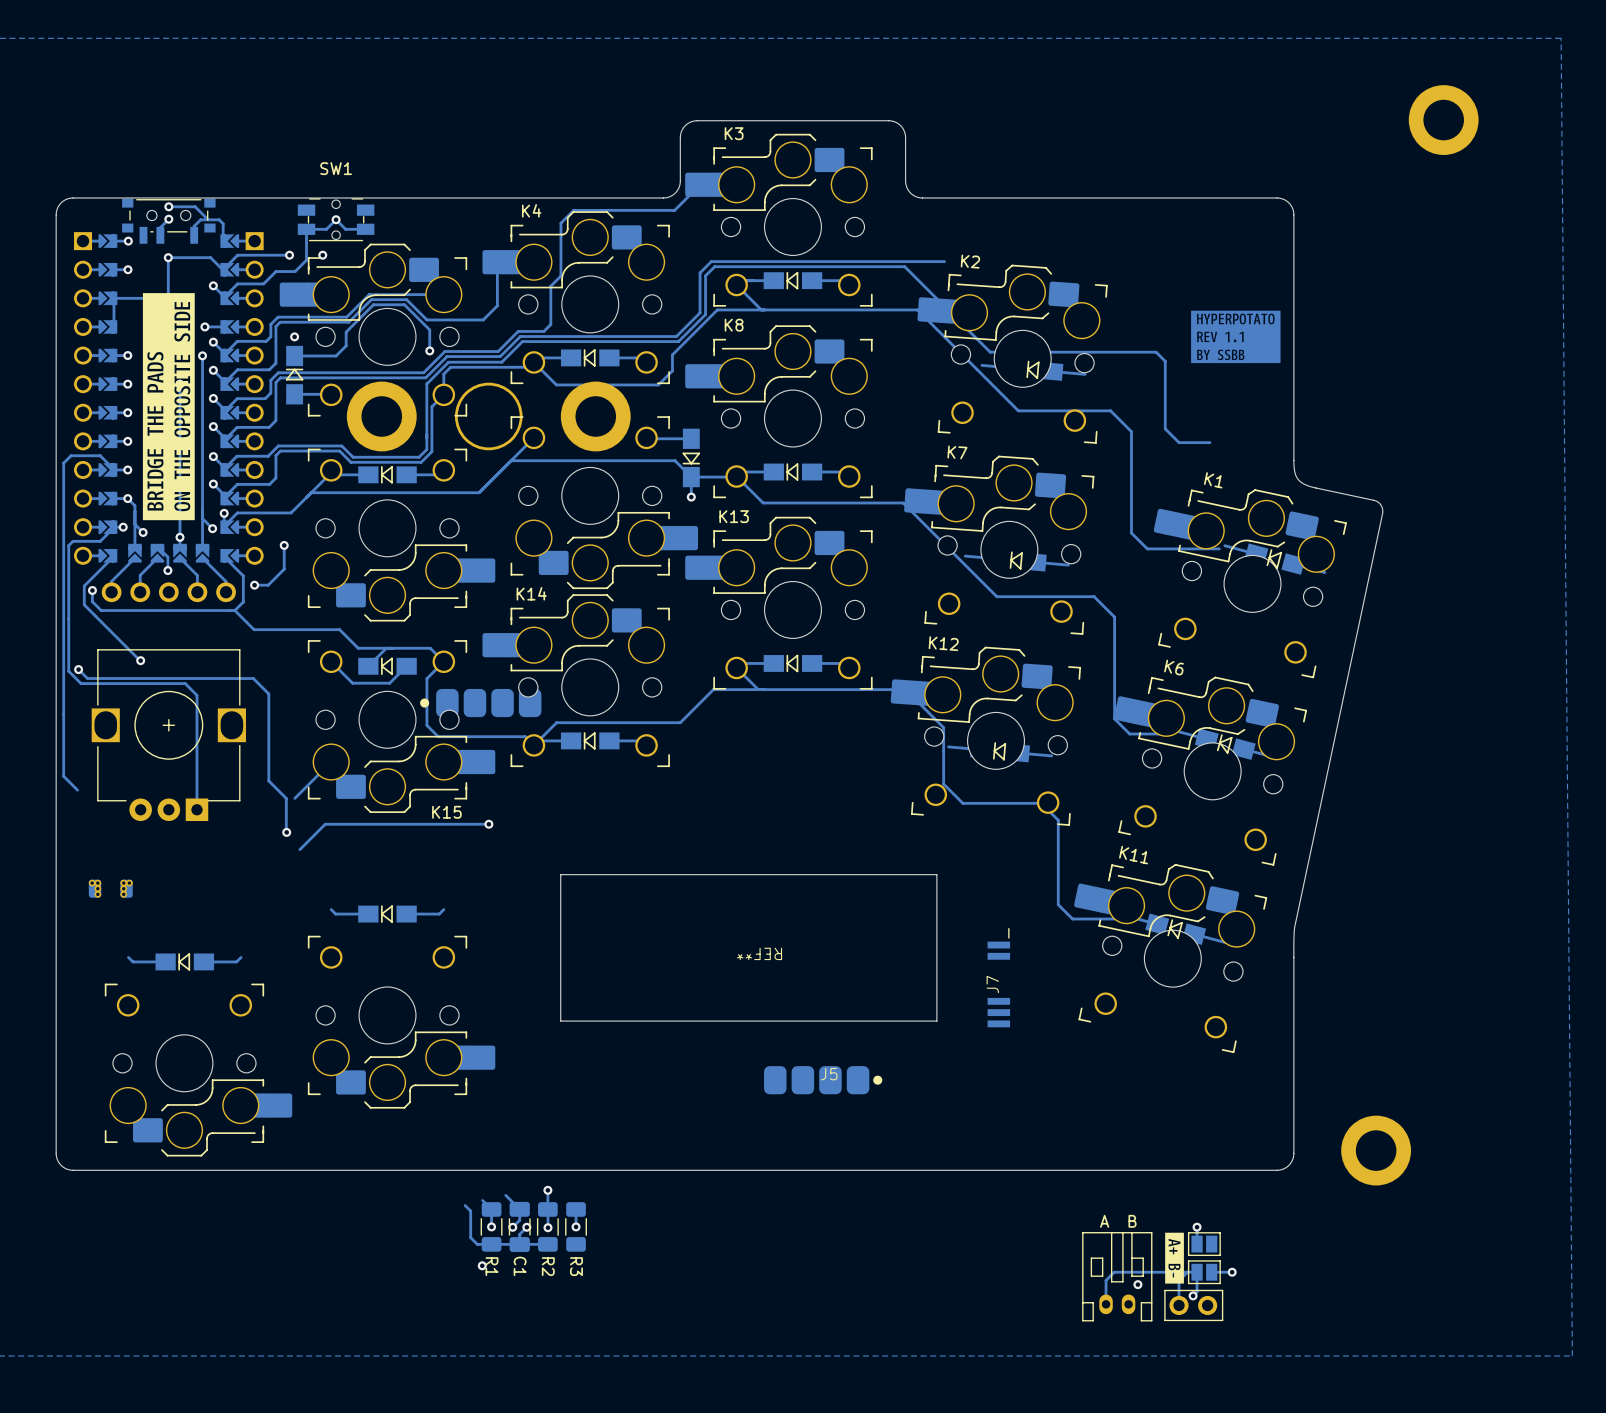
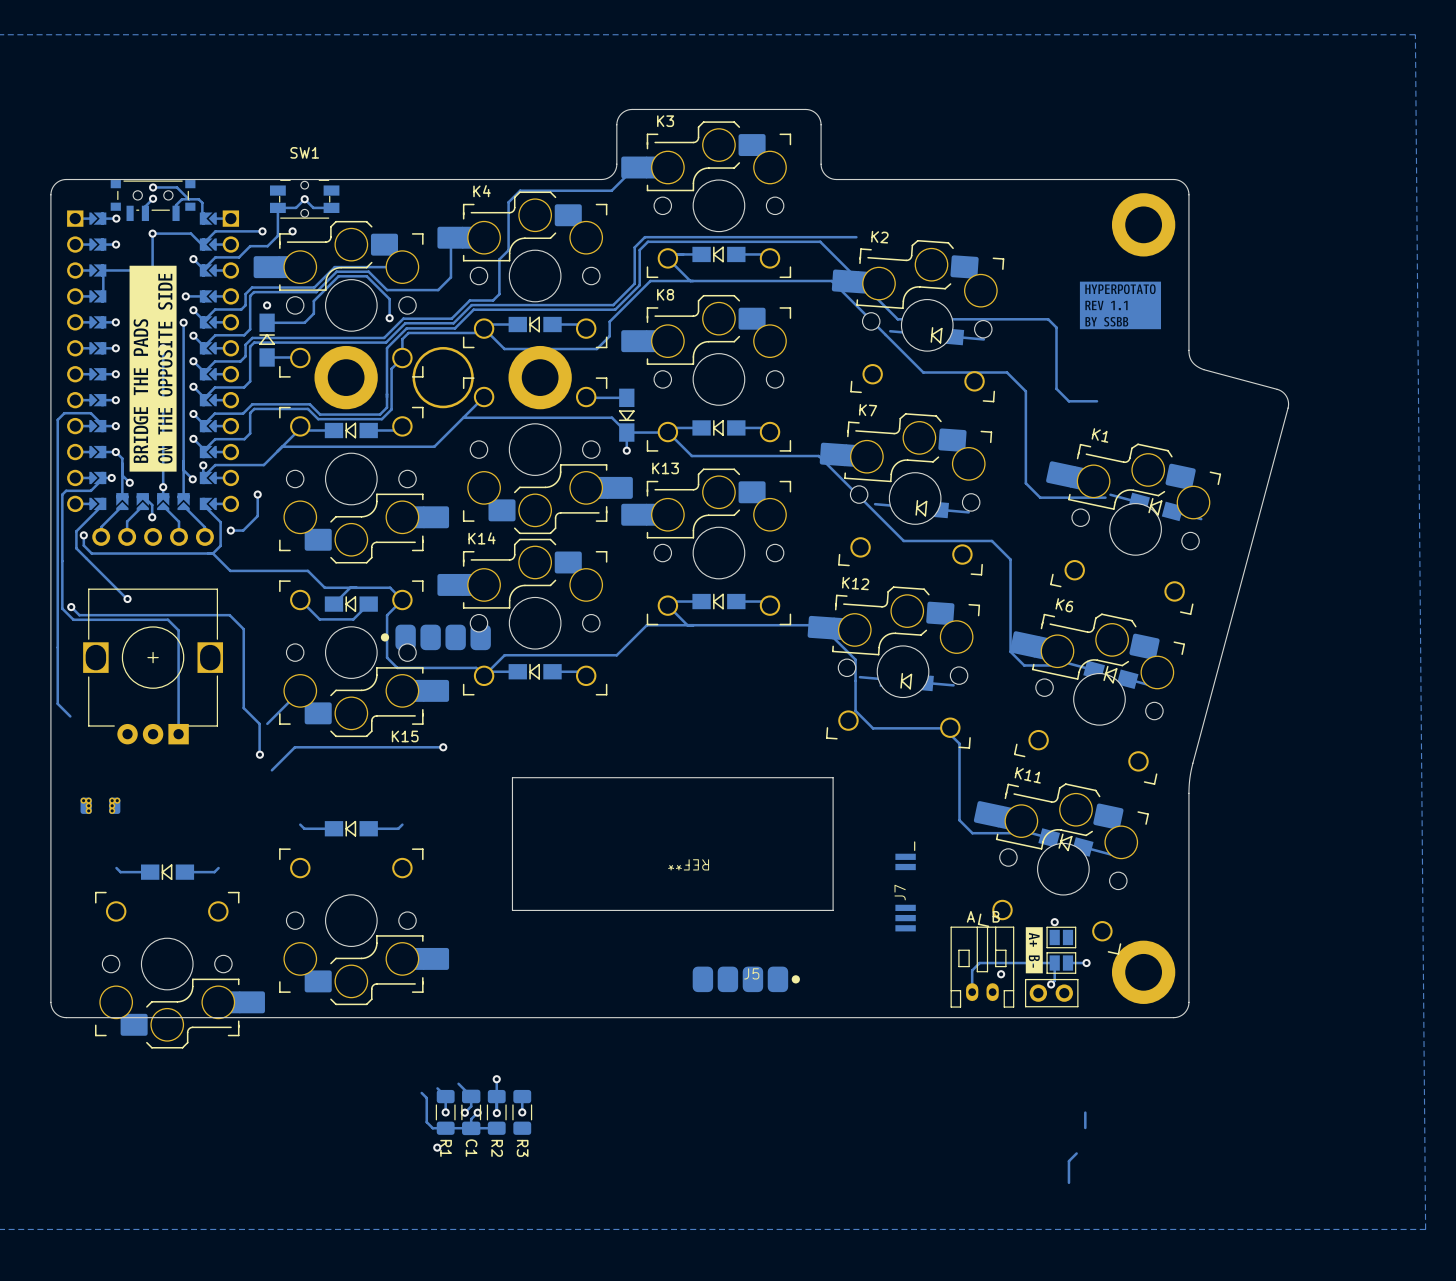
part position: (1443, 120) -> (1143, 224)
board edge: (1276, 197) (1288, 202) (1293, 213) (1293, 460) (1295, 475) (1300, 481) (1309, 486) (1376, 501) (1381, 505) (1382, 511) (1294, 927) (1293, 1153) (1292, 1160) (1287, 1166) (1276, 1170) (73, 1170) (62, 1166) (56, 1157) (56, 1105) -> (1203, 369) (1279, 389) (1285, 394) (1288, 404) (1190, 773) (1188, 793) (1188, 1002) (1186, 1010) (1180, 1016) (1173, 1017) (66, 1017) (55, 1013) (50, 1002)
board edge: none -> (1157, 179) (1178, 180) (1185, 185) (1188, 191) (1189, 353) (1193, 362) (1203, 369)
board edge: (936, 874) (560, 874) (560, 1021) (936, 1021) (936, 874) -> (833, 777) (833, 910) (512, 910) (512, 777) (833, 777)
via: none -> (1054, 922)
part: none -> (1061, 937)
part: none -> (1061, 963)
via: none -> (1086, 963)
via: none -> (1001, 974)
via: none -> (1051, 984)
part position: (1376, 1150) -> (1143, 972)
text position: A B (1118, 1221) -> A B (983, 916)
via: (1197, 1227) -> none
part: (1204, 1244) -> none
drawing position: (1174, 1258) -> (1034, 950)
part: (1204, 1272) -> none
track: (1232, 1272) (1211, 1272) -> (1086, 963) (1067, 963)
via: (1232, 1272) -> none
part position: (1117, 1276) -> (982, 967)
via: (1137, 1284) -> none
track: (1193, 1295) (1197, 1291) (1197, 1272) (1114, 1272) (1106, 1280) (1106, 1304) -> (1051, 984) (1054, 980) (1054, 963) (979, 963) (972, 970) (972, 992)
via: (1193, 1295) -> none
part position: (1193, 1305) -> (1051, 993)

